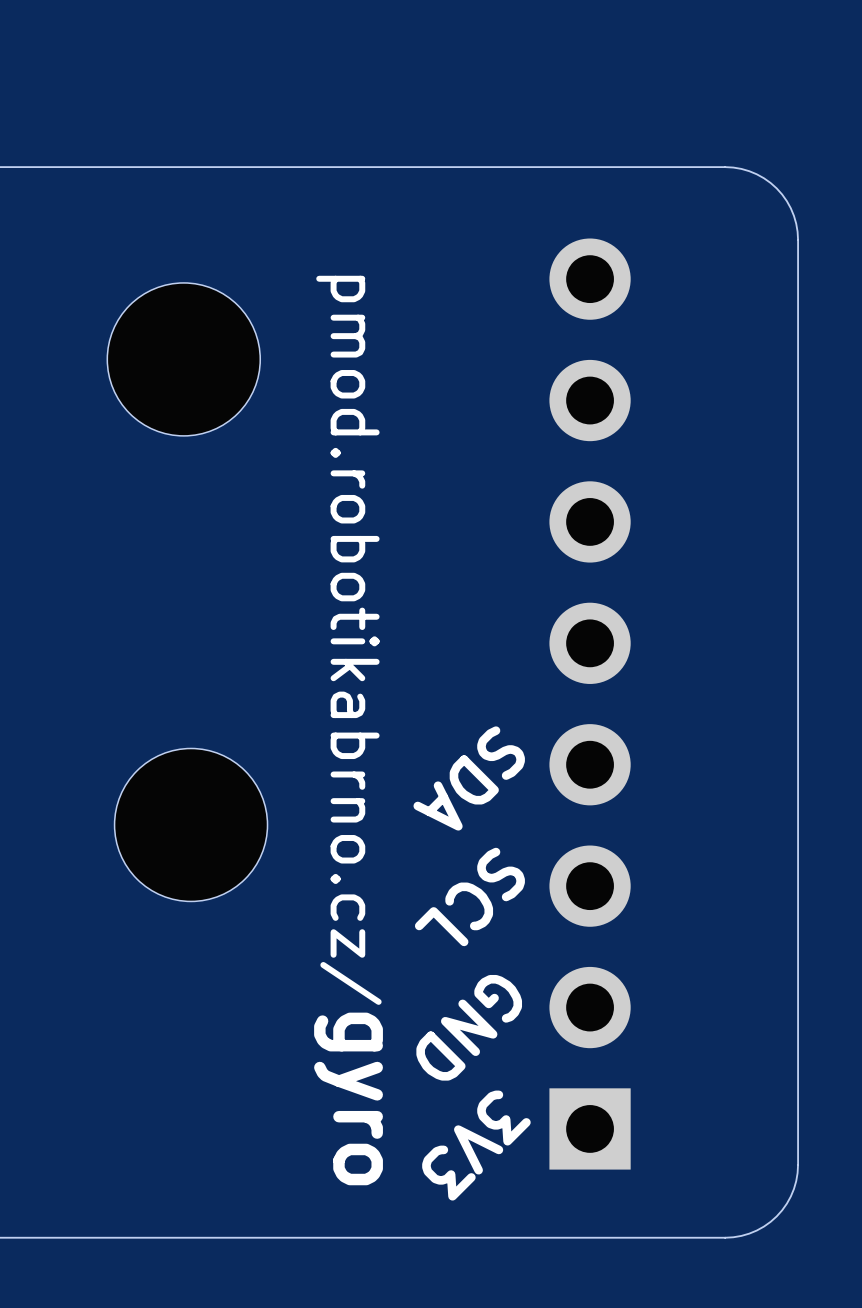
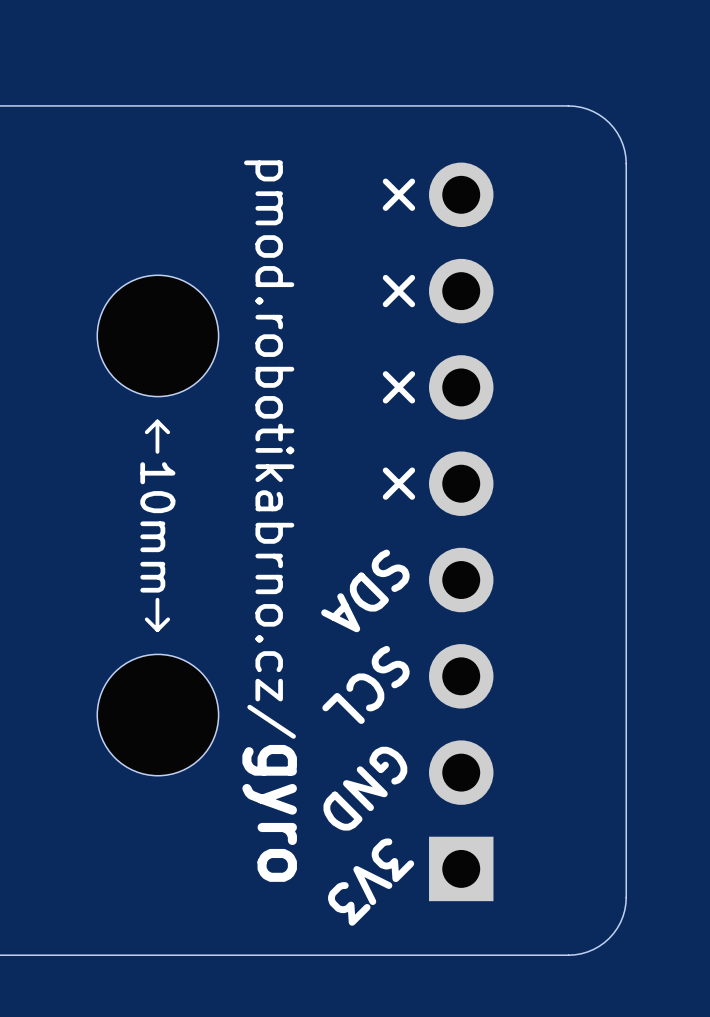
line: none -> (385, 181) (412, 208)
line: none -> (412, 181) (385, 208)
part position: (183, 359) -> (157, 335)
line: none -> (385, 277) (412, 304)
line: none -> (412, 277) (385, 304)
line: none -> (385, 374) (412, 400)
line: none -> (412, 374) (385, 400)
line: none -> (157, 421) (168, 432)
line: none -> (157, 421) (146, 432)
line: none -> (157, 421) (157, 451)
line: none -> (385, 470) (412, 496)
line: none -> (412, 470) (385, 496)
text position: pmod.robotikabrno.cz/ (348, 640) -> pmod.robotikabrno.cz/ (269, 449)
text: none -> 10mm (157, 527)
line: none -> (157, 599) (157, 630)
line: none -> (146, 619) (157, 630)
line: none -> (168, 619) (157, 630)
part position: (191, 824) -> (157, 715)
text position: gyro (348, 1098) -> gyro (269, 813)

